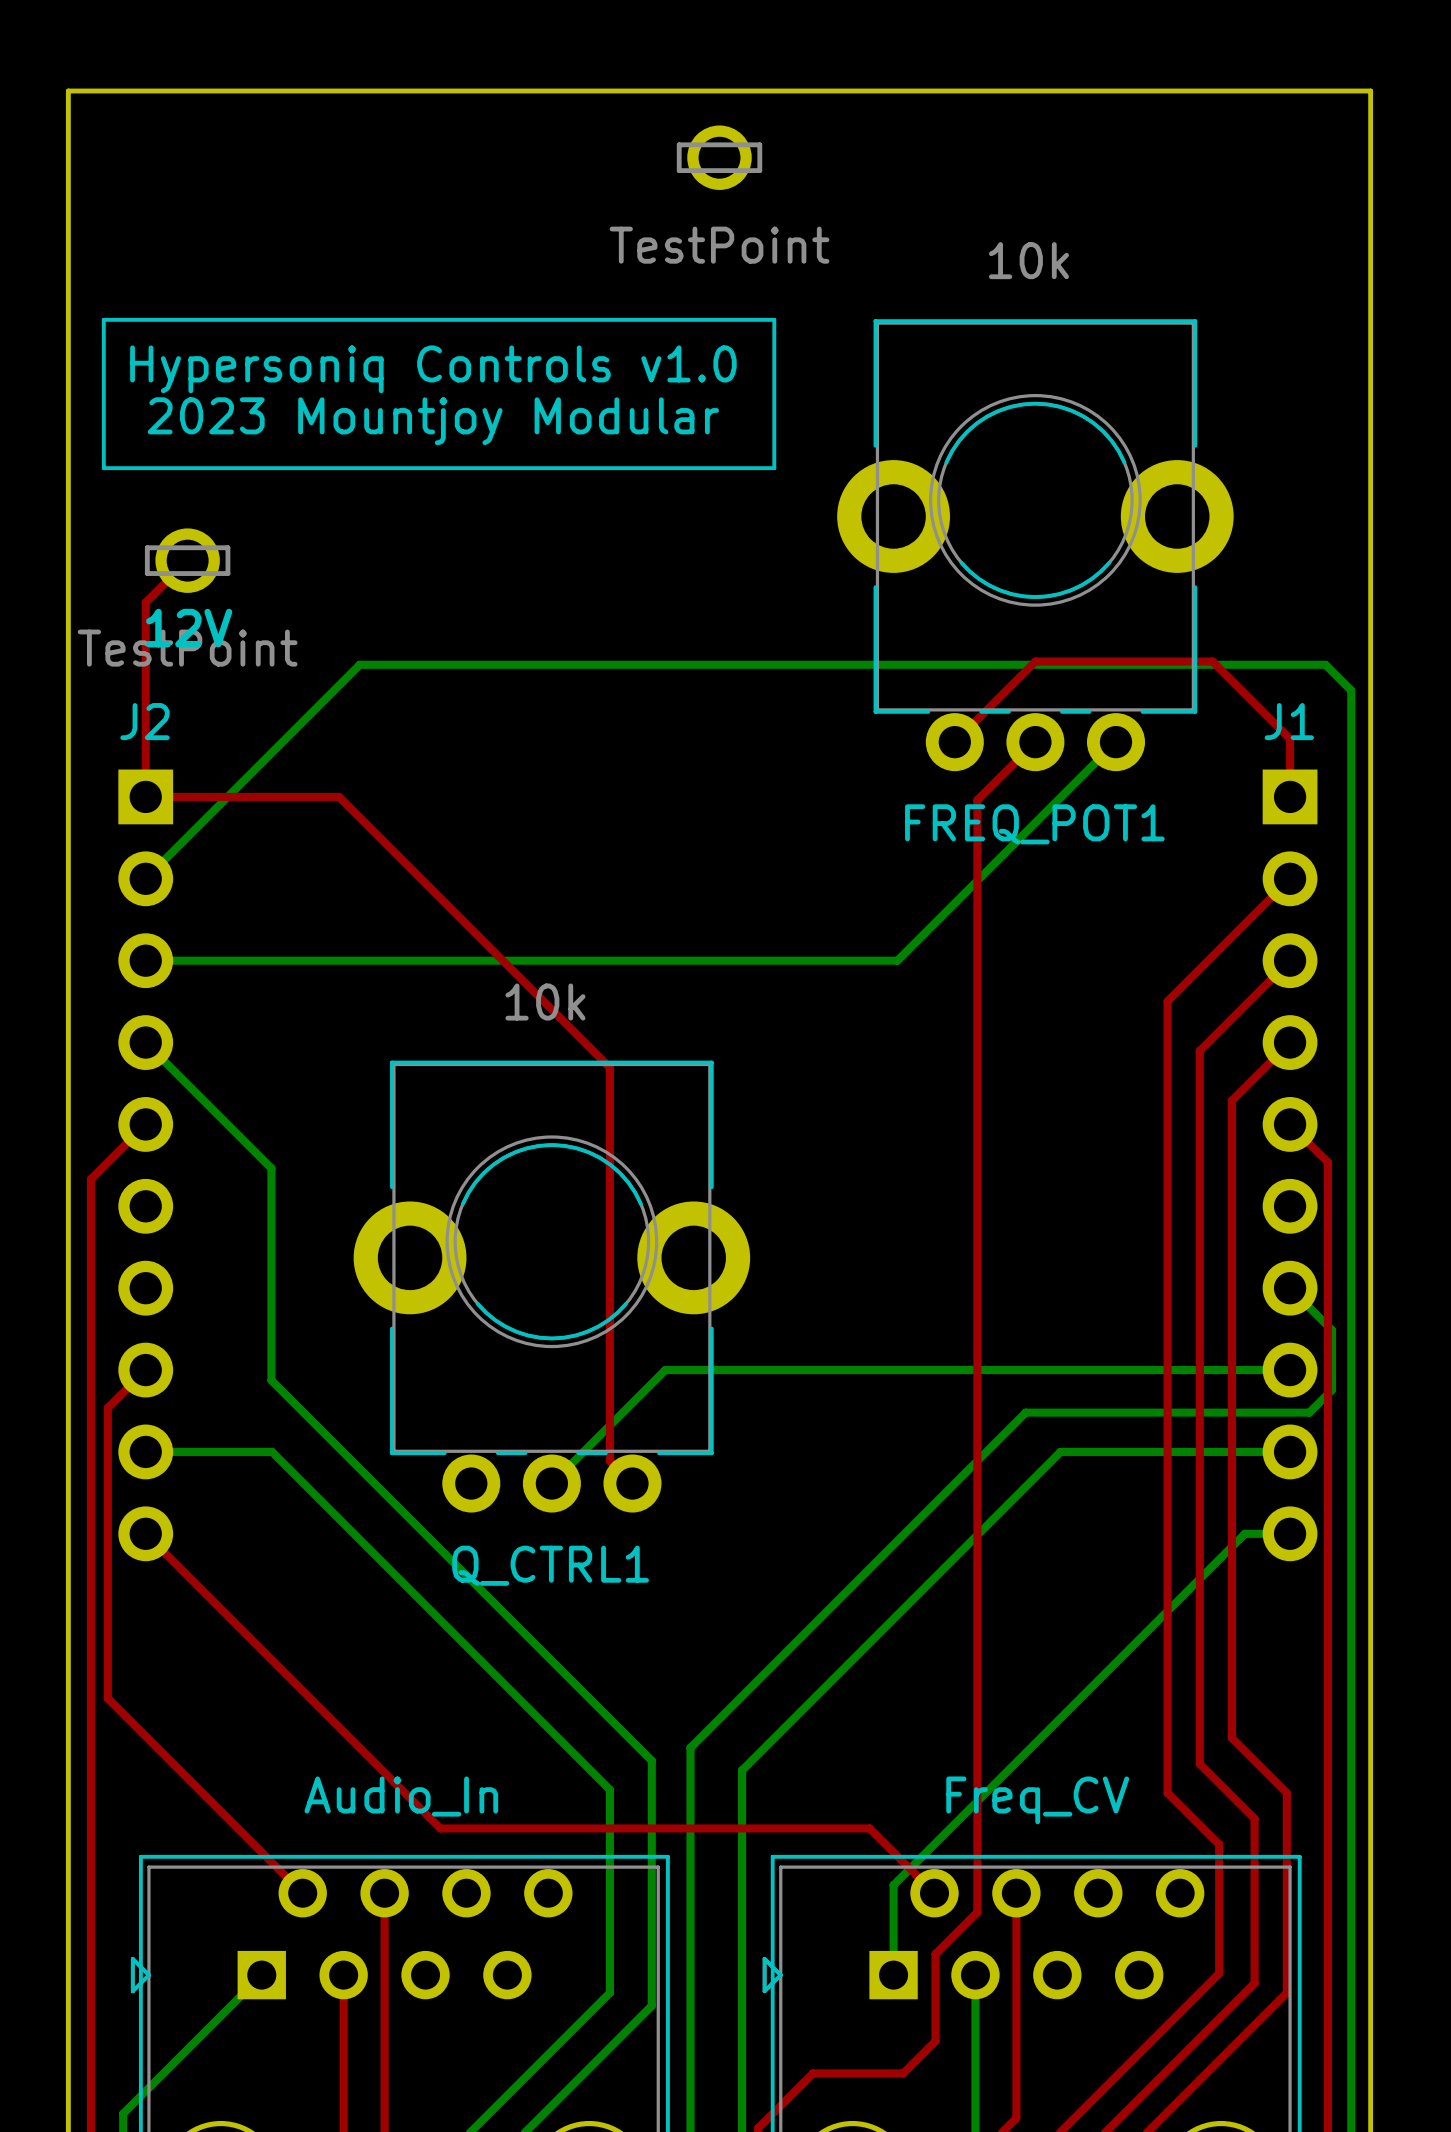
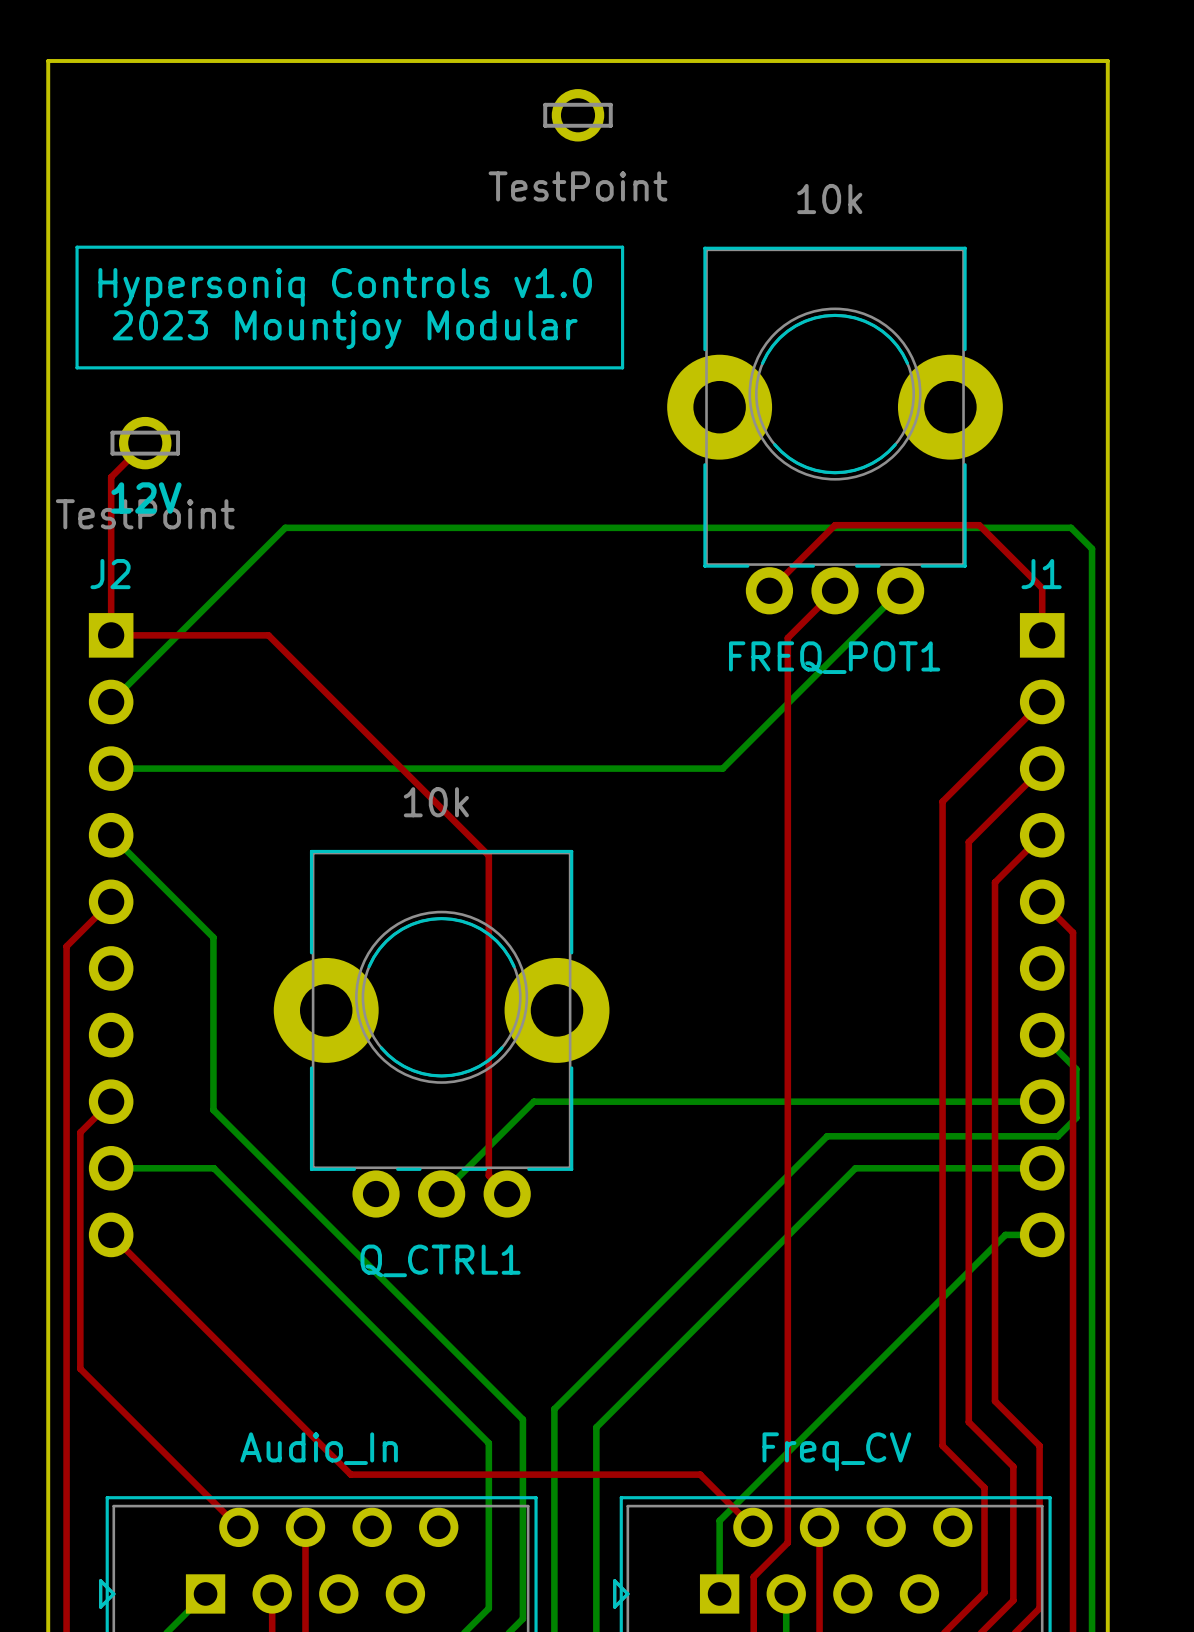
FREQ_POT1 footprint: [837, 319, 1234, 772] -> [667, 246, 1003, 615]
Q_CTRL1 footprint: [353, 1060, 751, 1513] -> [273, 849, 610, 1218]

